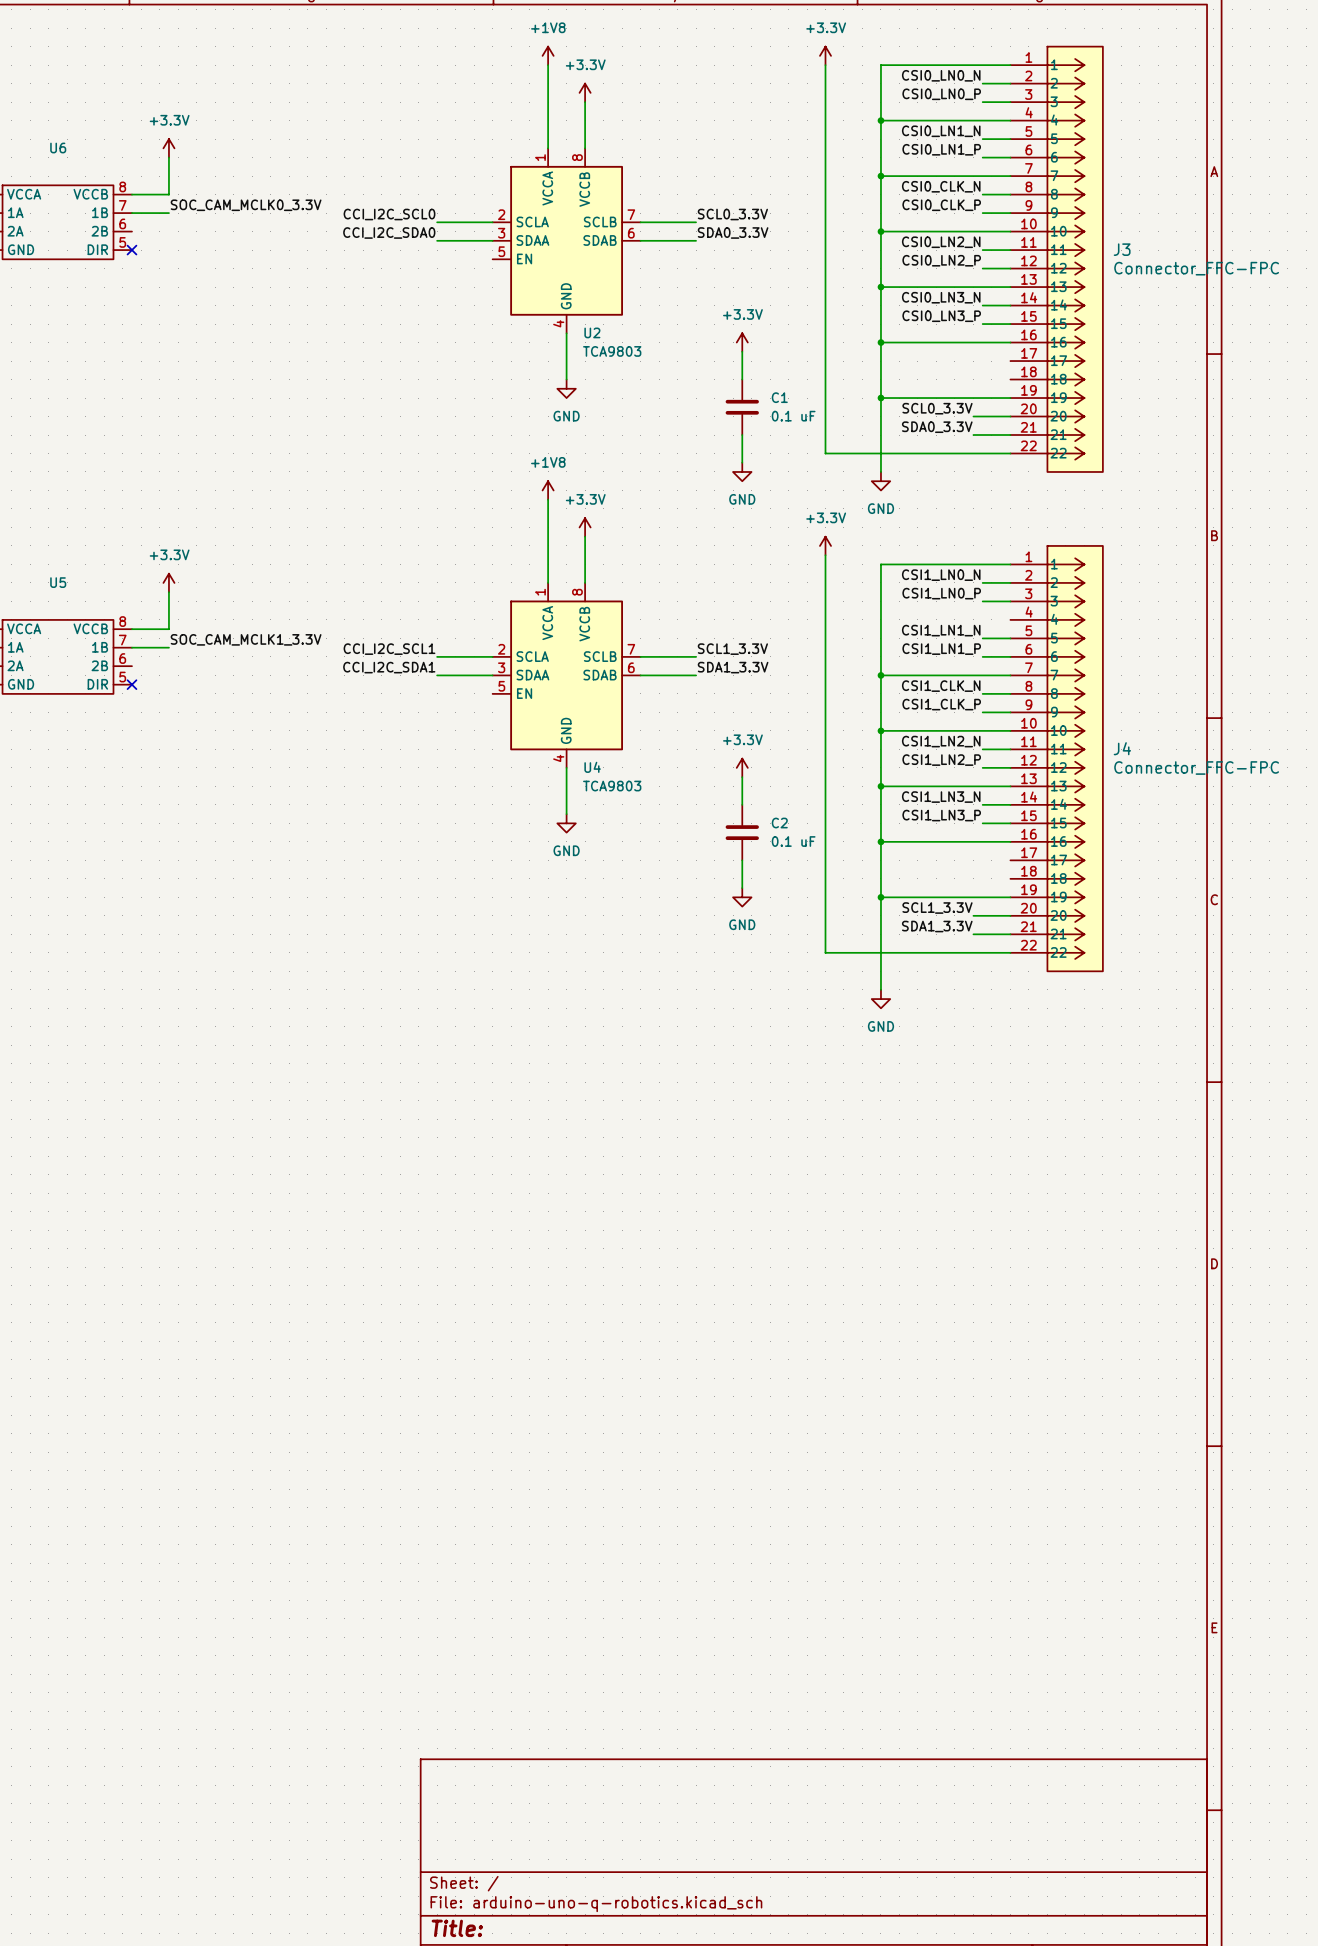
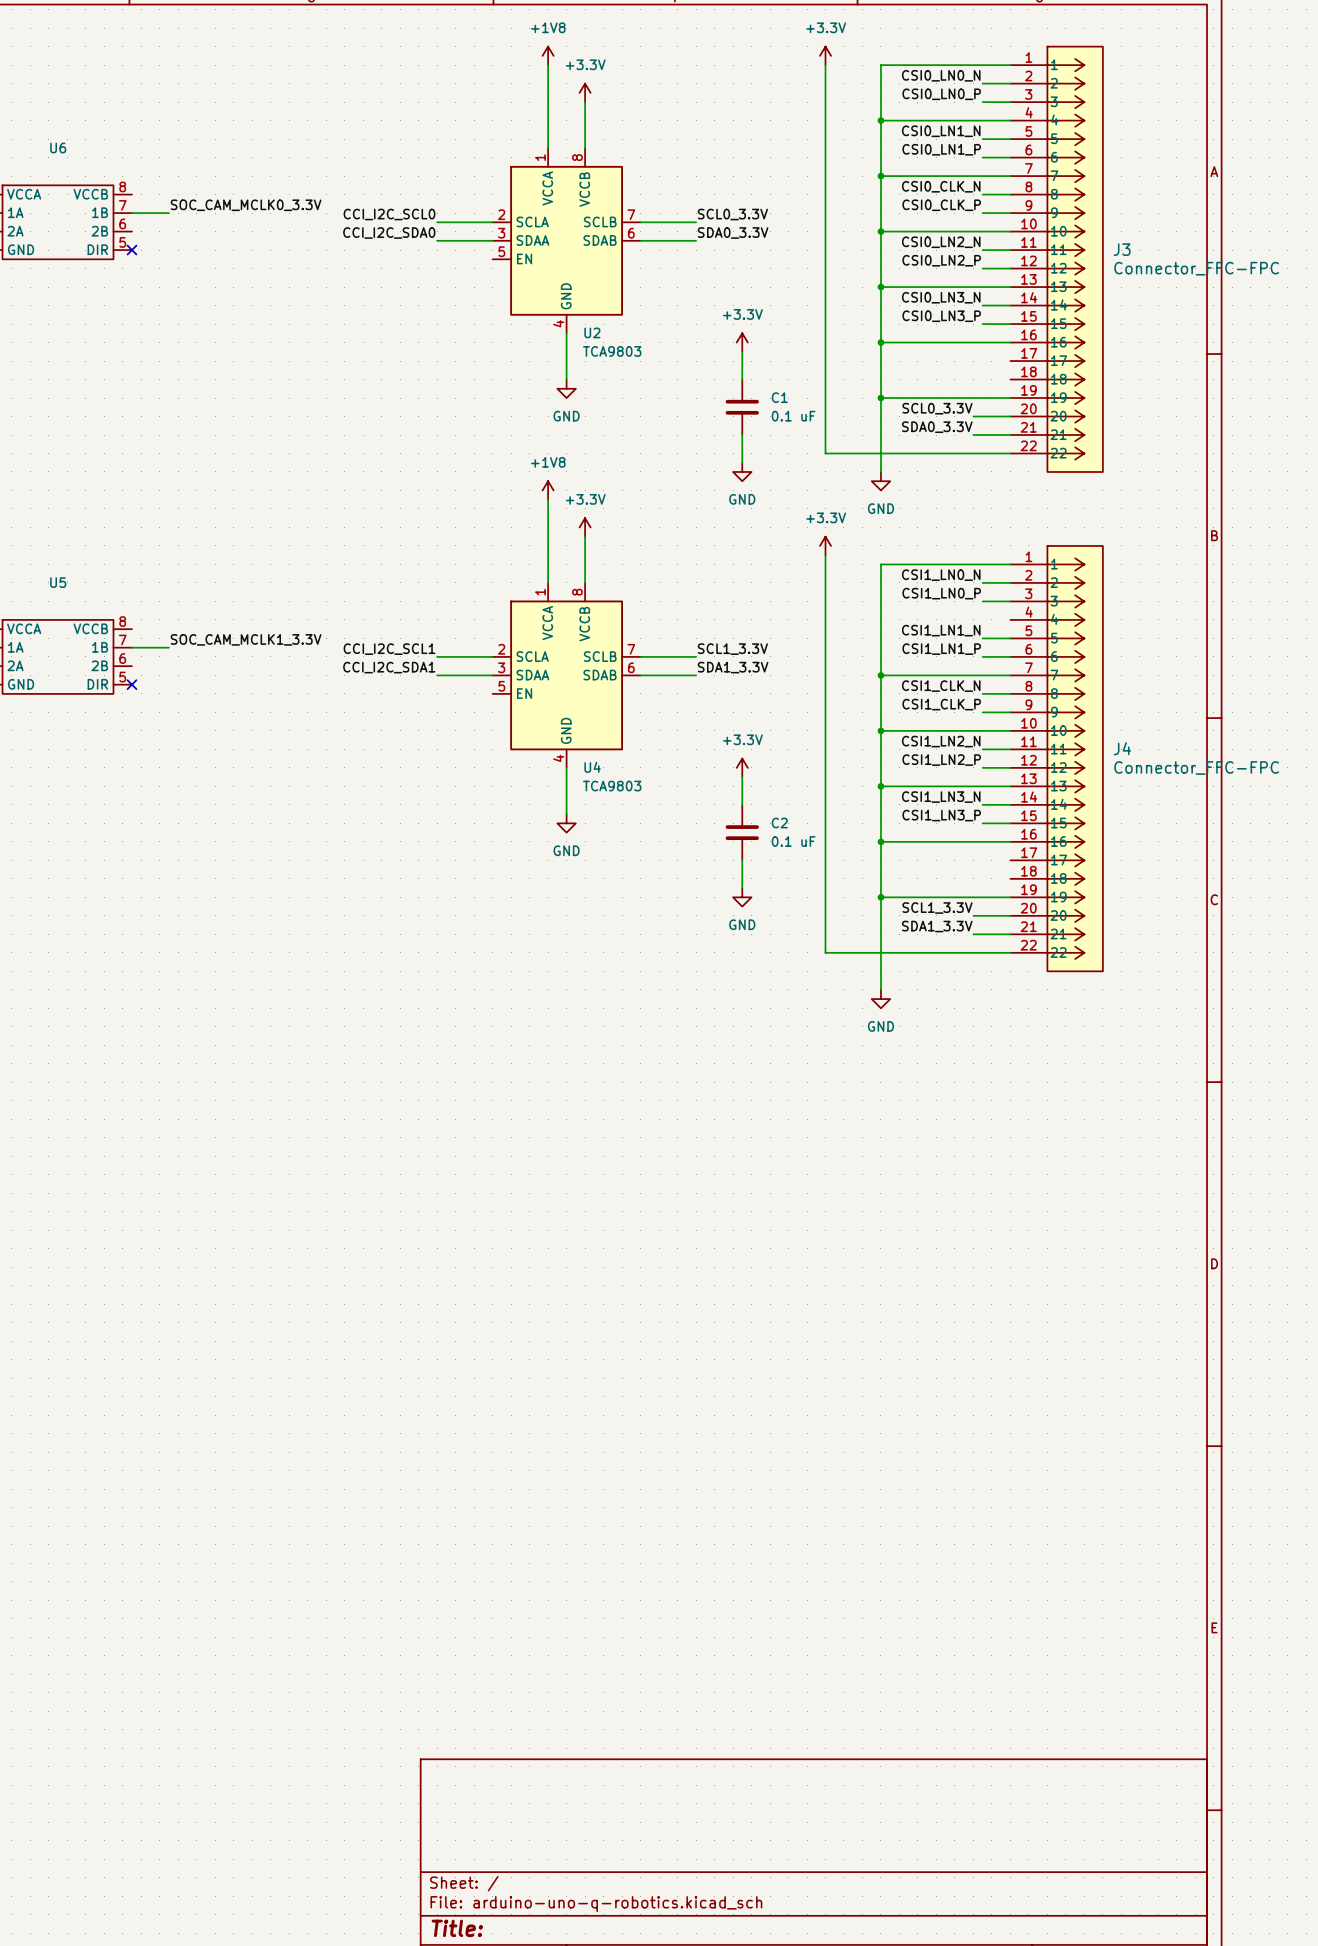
power symbol: +3.3V (168, 148) -> none
wire: (168, 157) (168, 194) (131, 194) -> none
power symbol: +3.3V (168, 582) -> none
wire: (168, 592) (168, 629) (131, 629) -> none

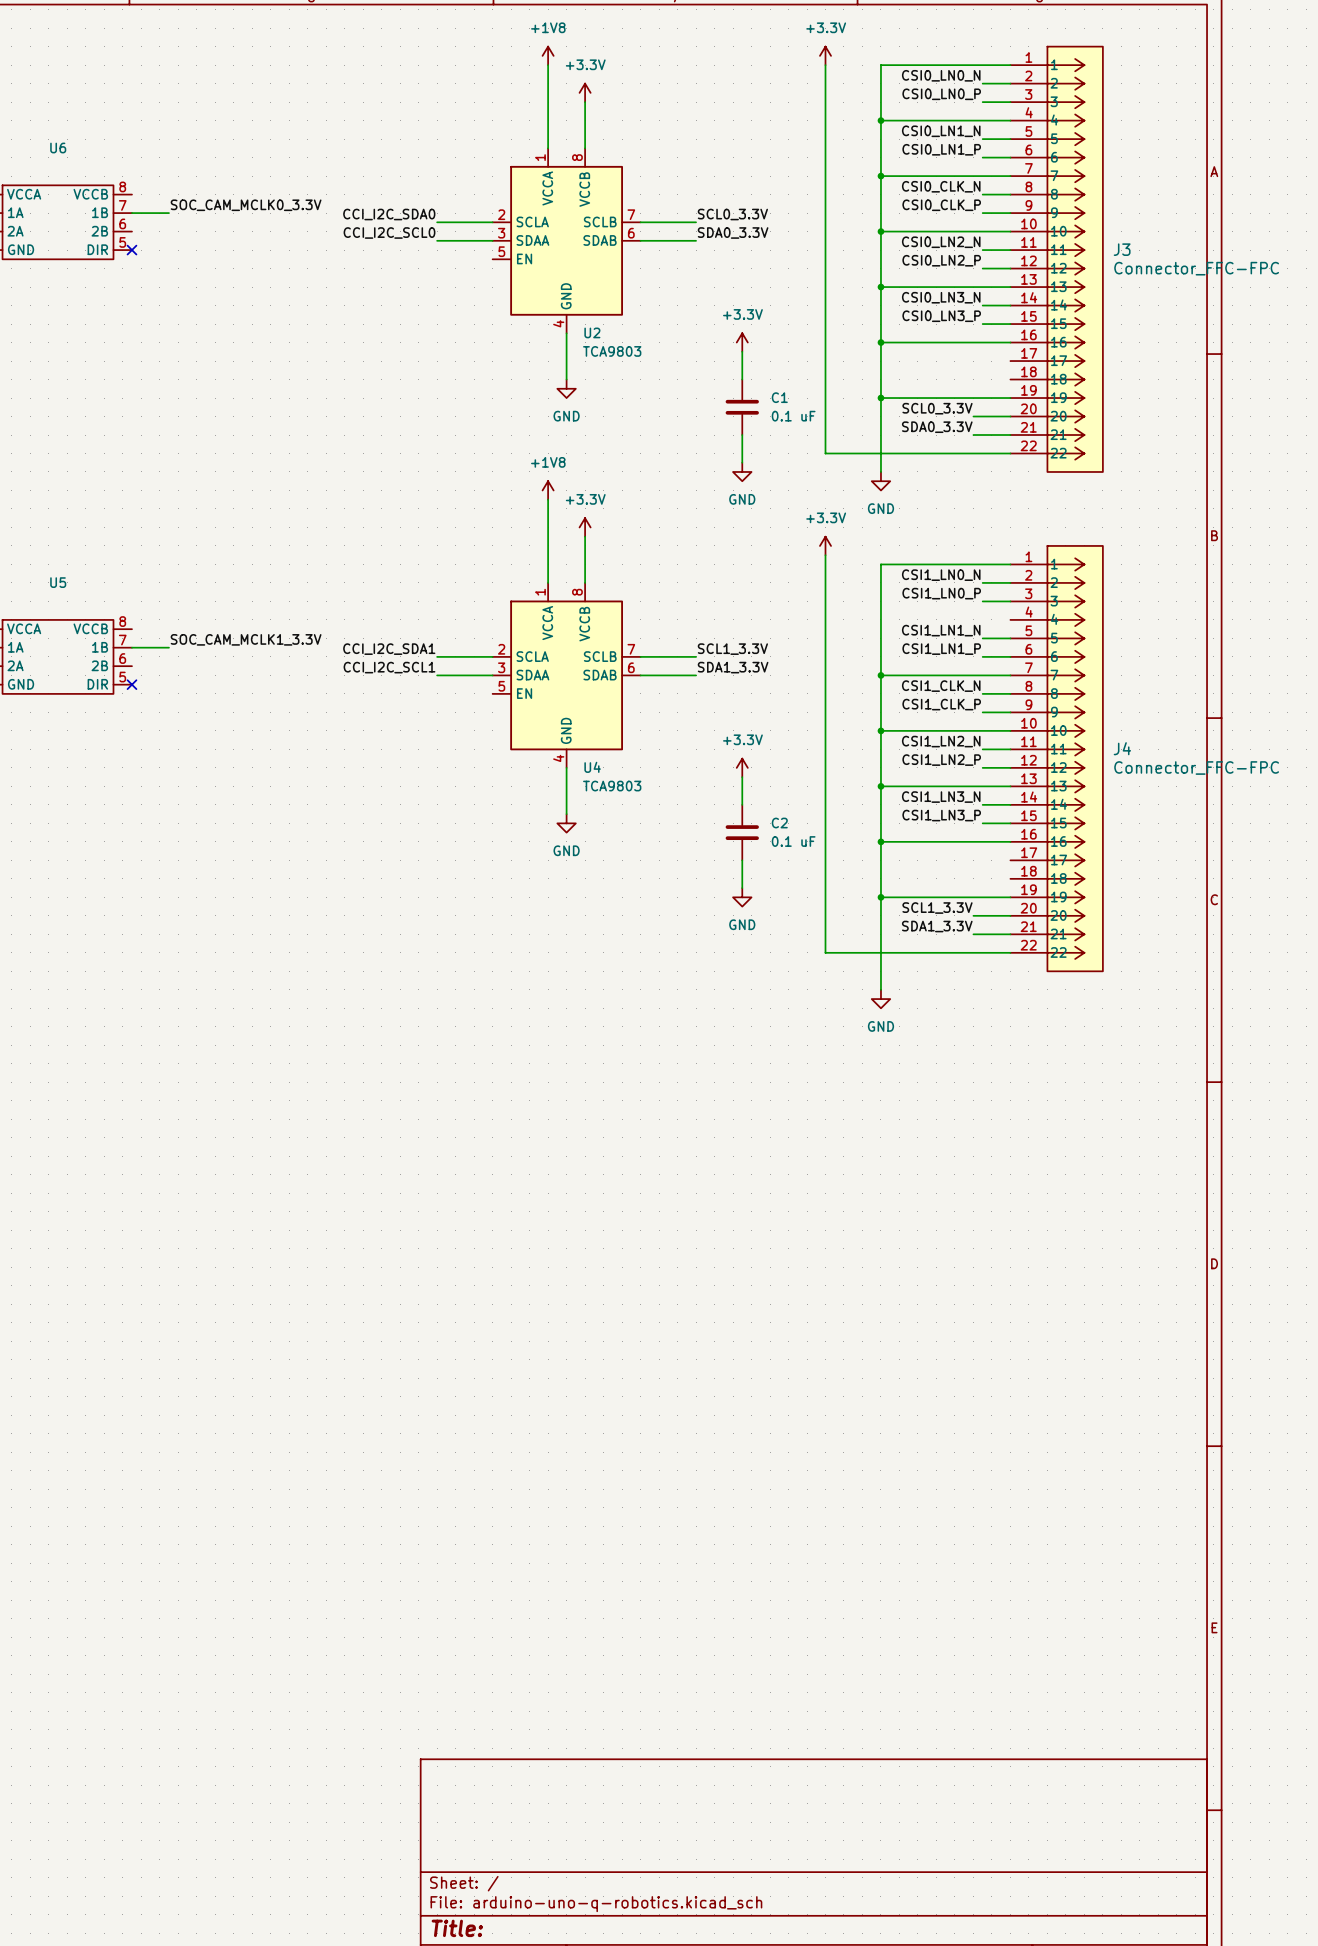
label: CCI_I2C_SCL0 (389, 214) -> CCI_I2C_SDA0 (389, 214)
label: CCI_I2C_SDA0 (389, 233) -> CCI_I2C_SCL0 (389, 233)
label: CCI_I2C_SCL1 (389, 649) -> CCI_I2C_SDA1 (389, 649)
label: CCI_I2C_SDA1 (389, 667) -> CCI_I2C_SCL1 (389, 667)

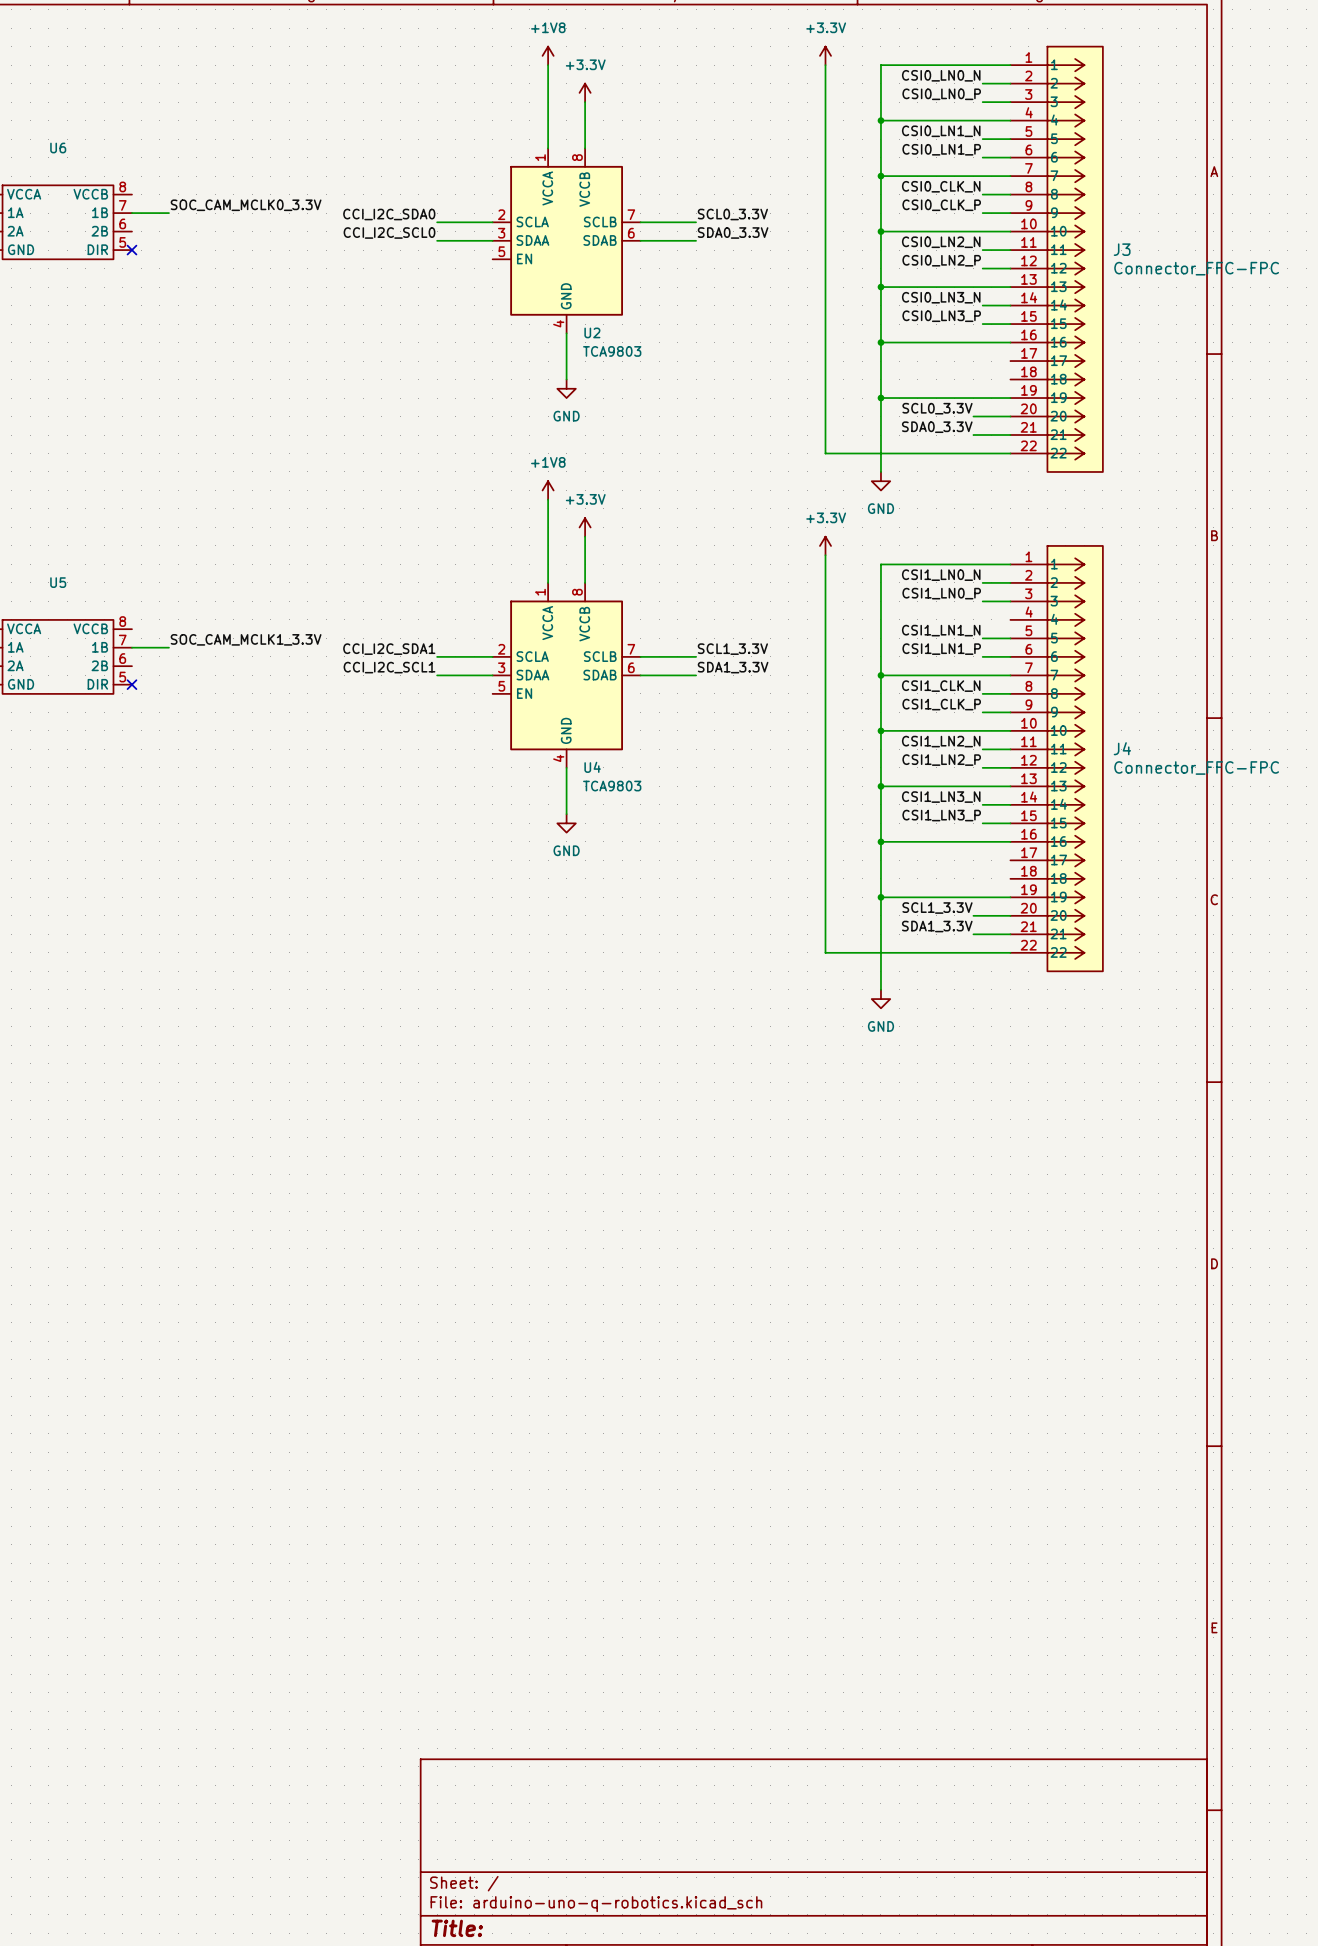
power symbol: +3.3V (742, 342) -> none
wire: (742, 351) (742, 379) -> none
C1: 0.1 uF (742, 407) -> none
wire: (742, 435) (742, 462) -> none
power symbol: GND (742, 471) -> none
power symbol: +3.3V (742, 767) -> none
wire: (742, 777) (742, 804) -> none
C2: 0.1 uF (742, 832) -> none
wire: (742, 860) (742, 888) -> none
power symbol: GND (742, 897) -> none

